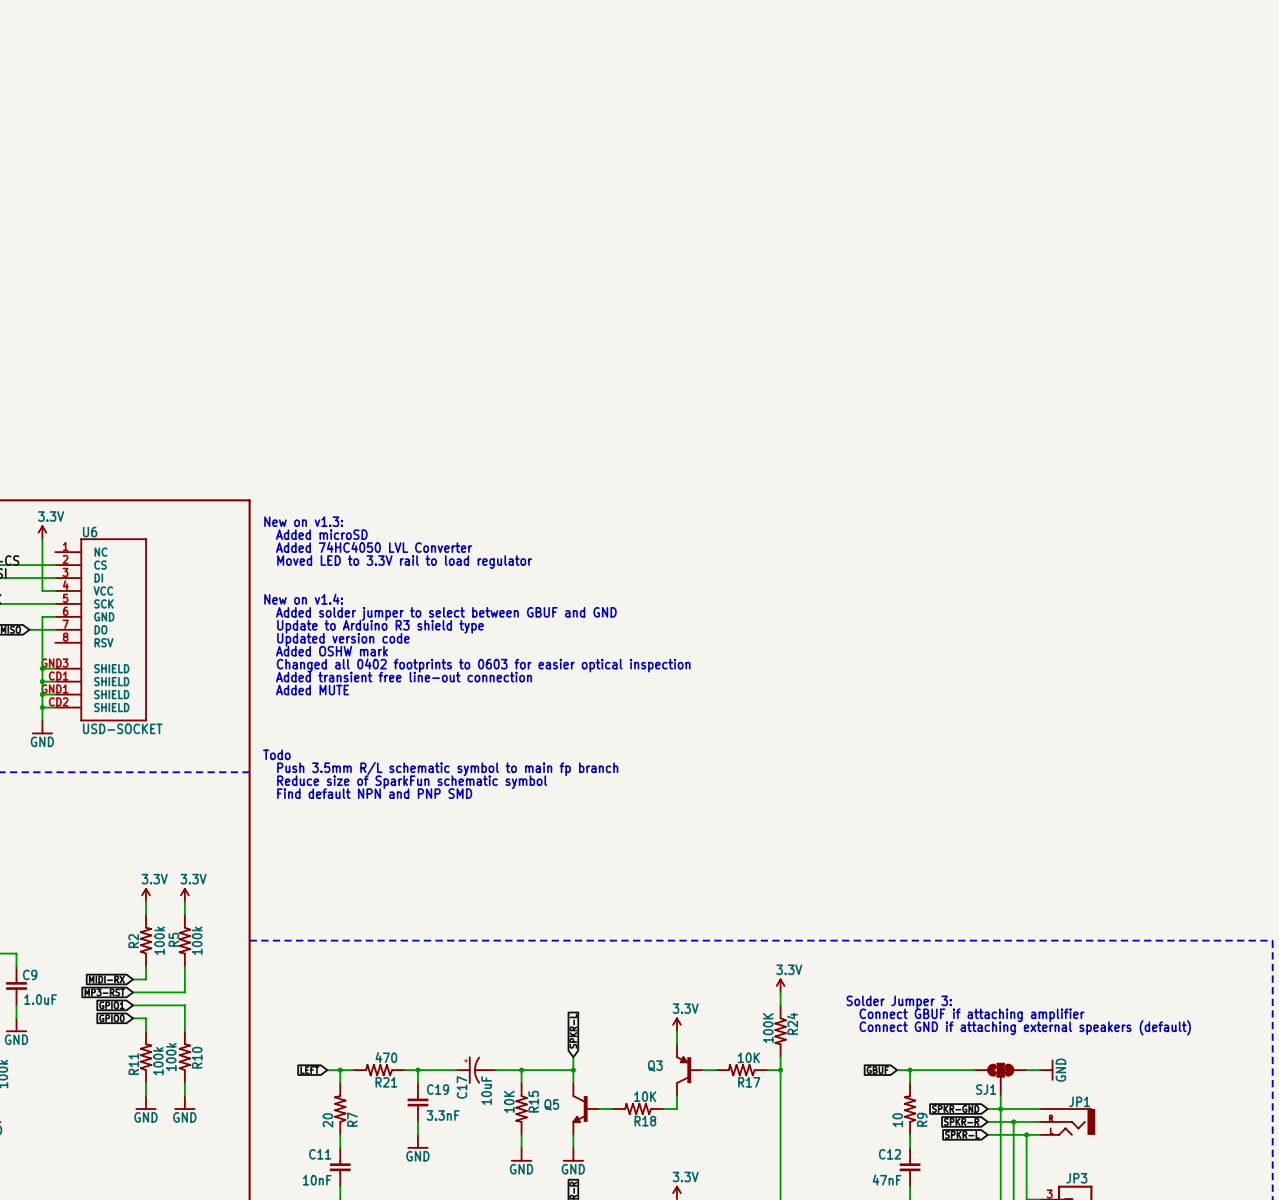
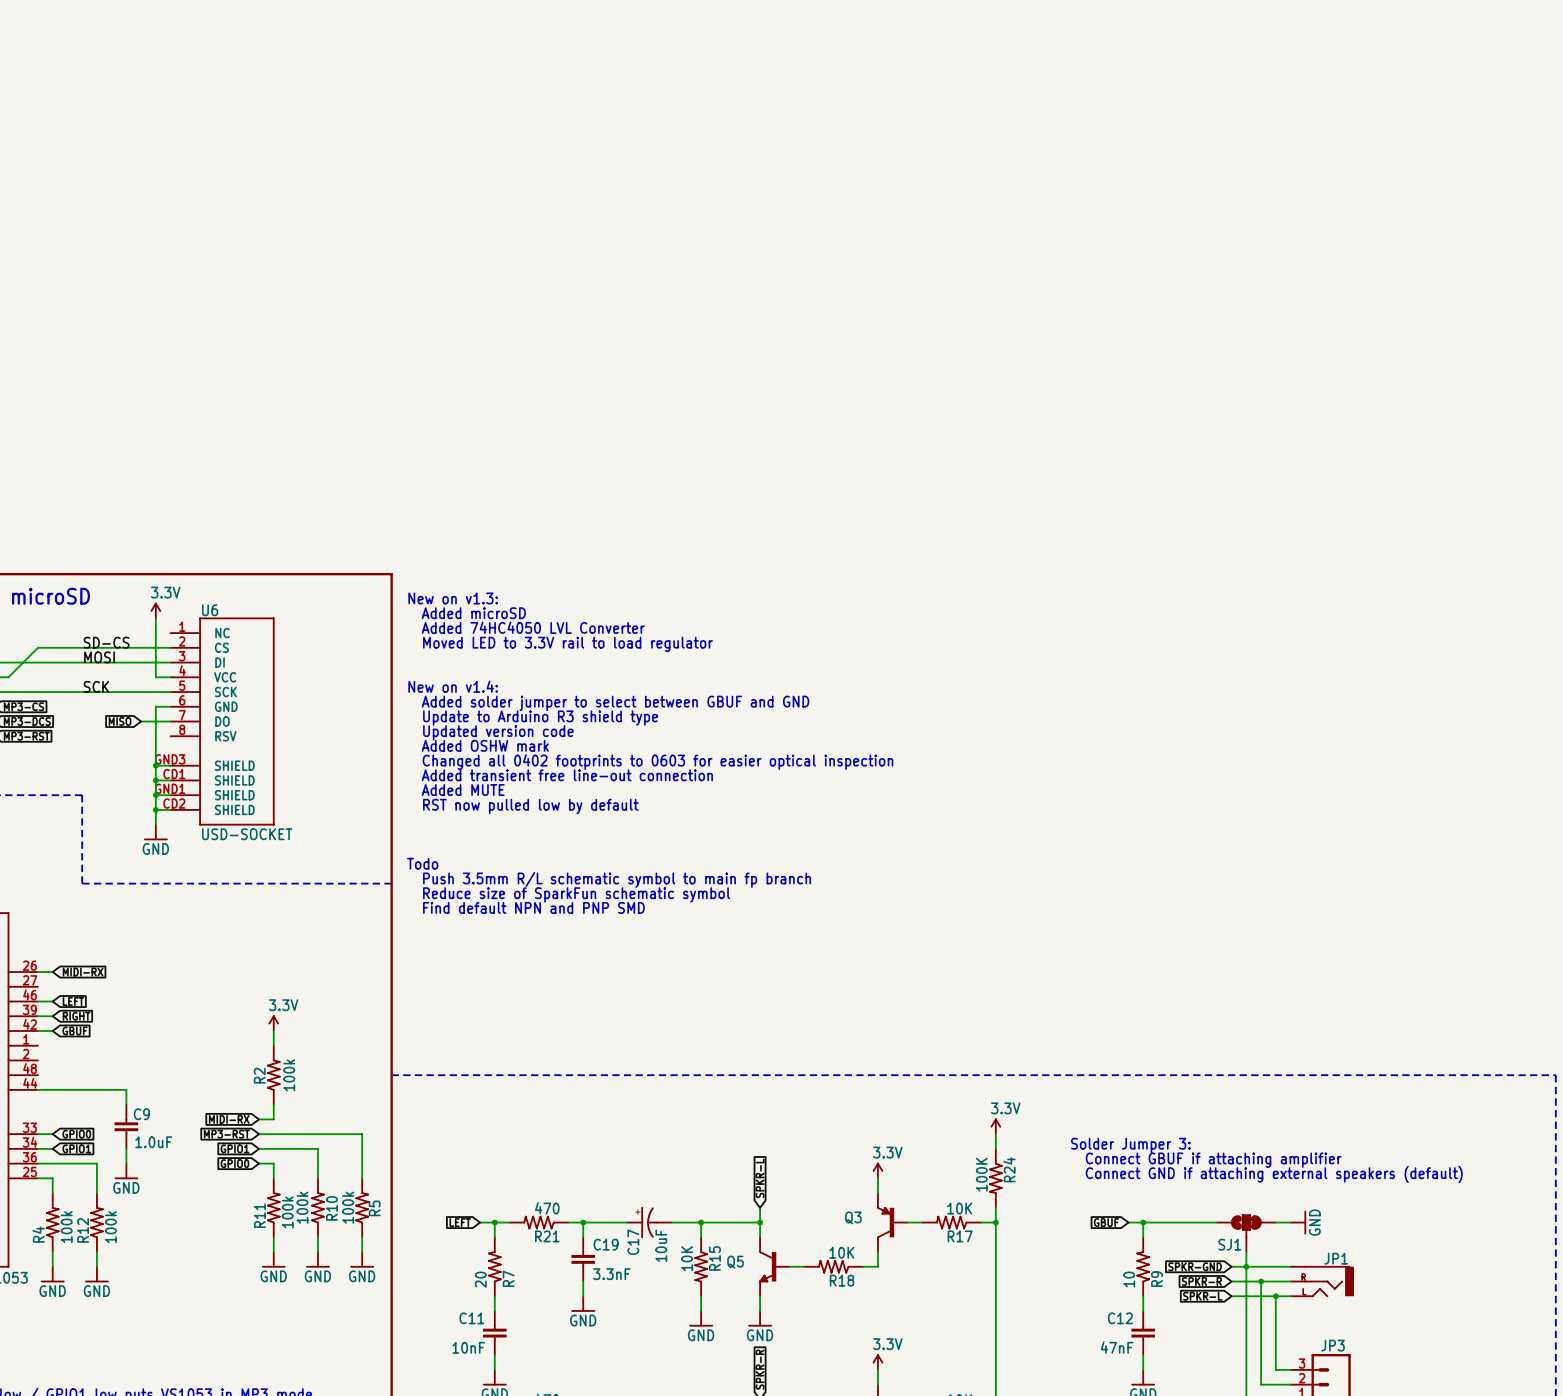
text: none -> RST now pulled low by default (530, 806)
power symbol: 3.3V (184, 894) -> none
wire: (184, 901) (184, 914) -> none
R5 rotation: 0° (184, 940) -> 180° (362, 1207)
R5 position: (184, 940) -> (362, 1207)
wire: (184, 966) (184, 992) -> (362, 1178) (362, 1134) (317, 1134)
wire: none -> (362, 1237) (362, 1252)
power symbol: none -> GND (362, 1259)

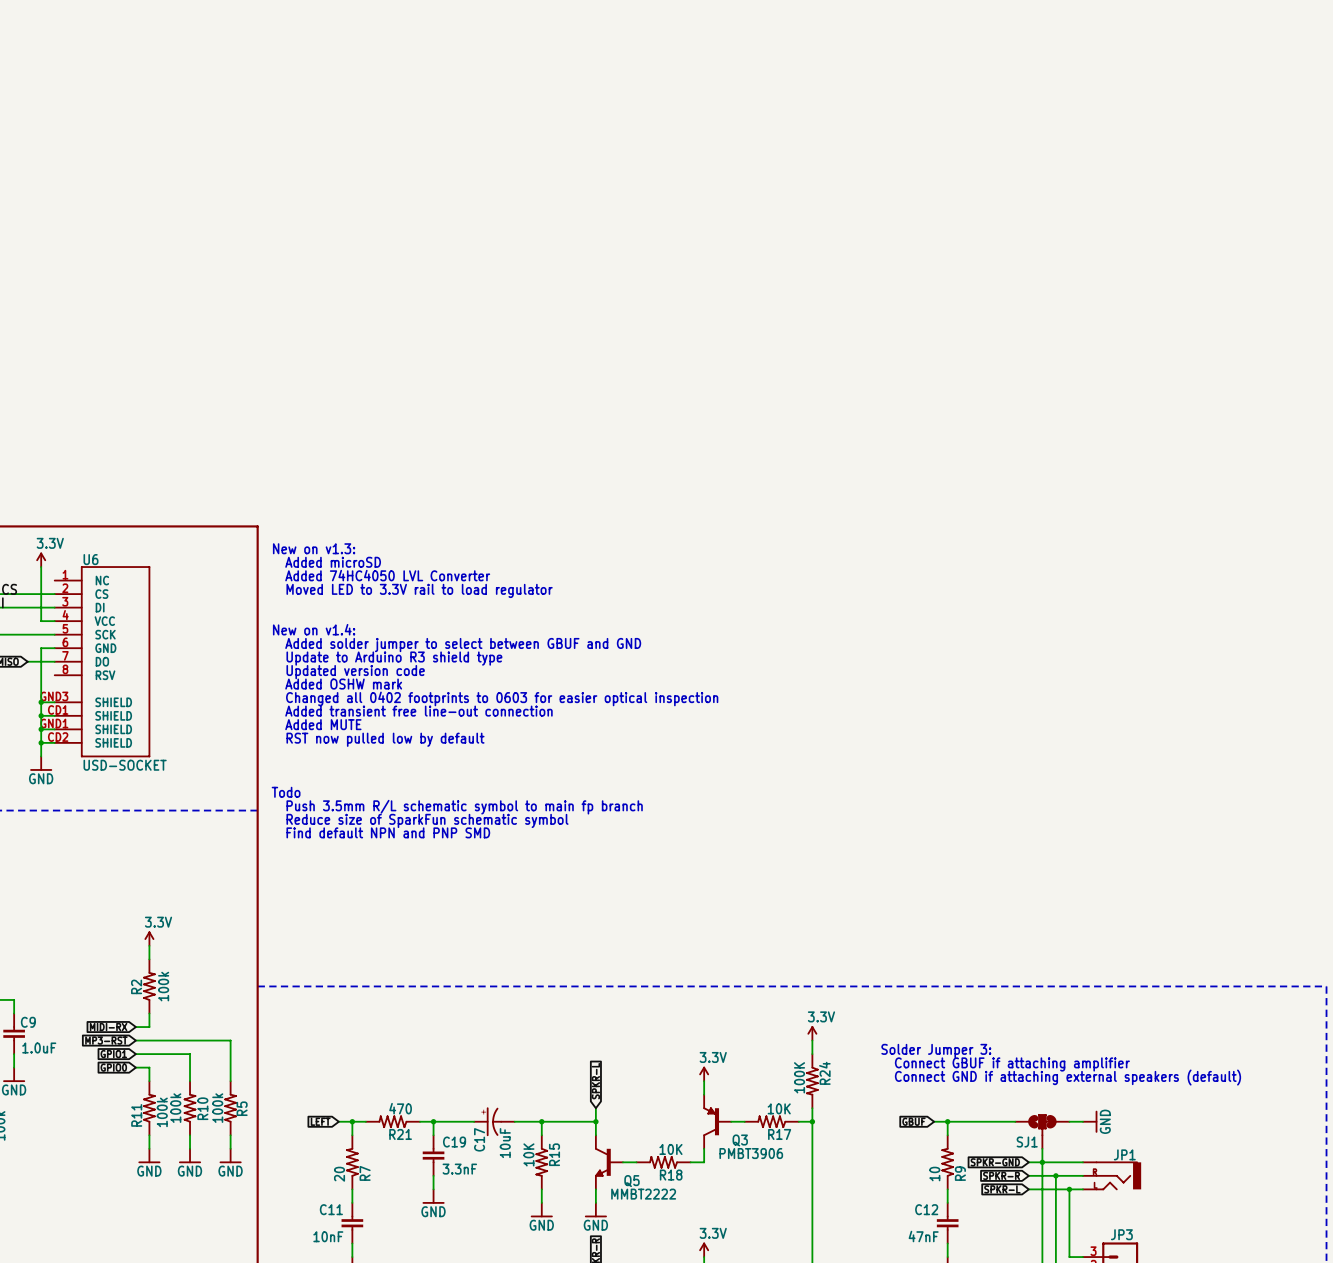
Q3 name position: Q3 (853, 1217) -> Q3 (740, 1140)
Q3 value: none -> PMBT3906 (751, 1153)
Q5 name position: Q5 (735, 1262) -> Q5 (631, 1181)
Q5 value: none -> MMBT2222 (643, 1194)

